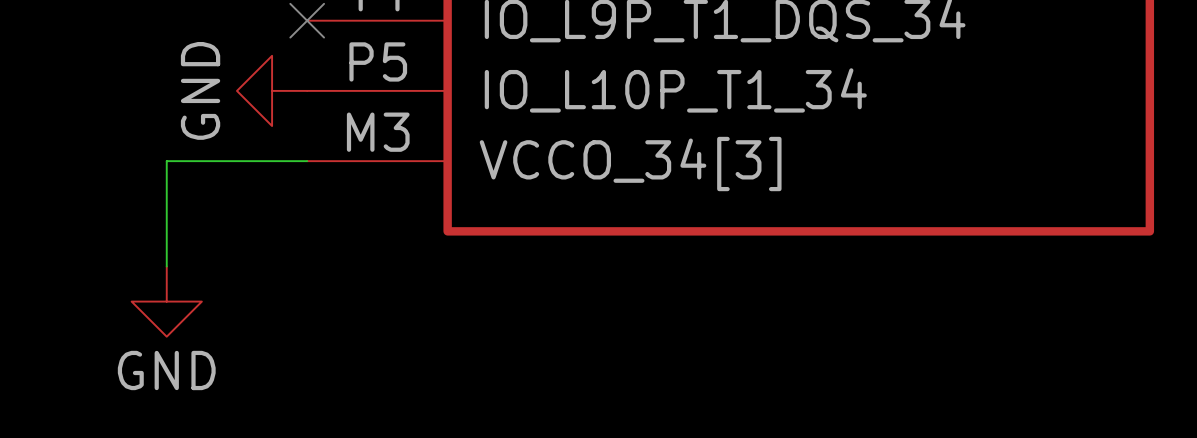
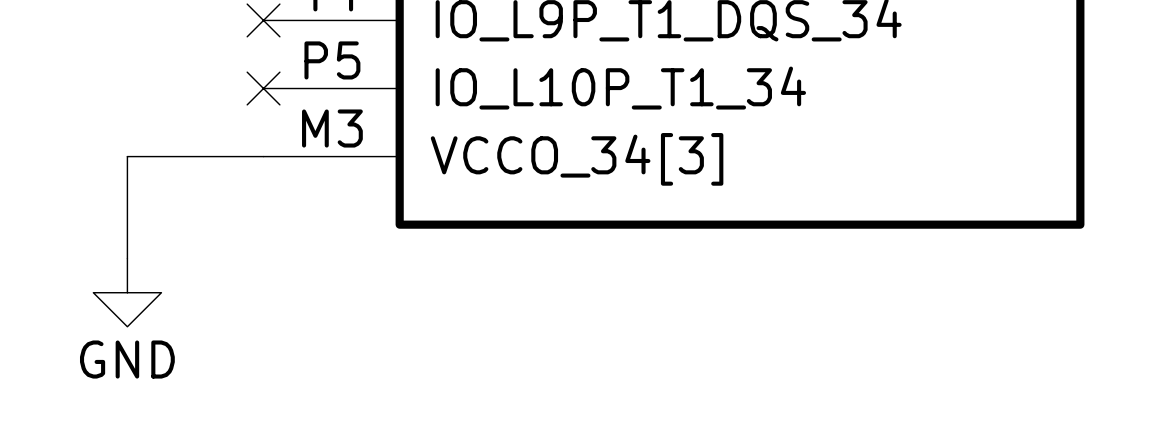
power symbol: GND (272, 90) -> none
no-connect mark: none -> (263, 88)

